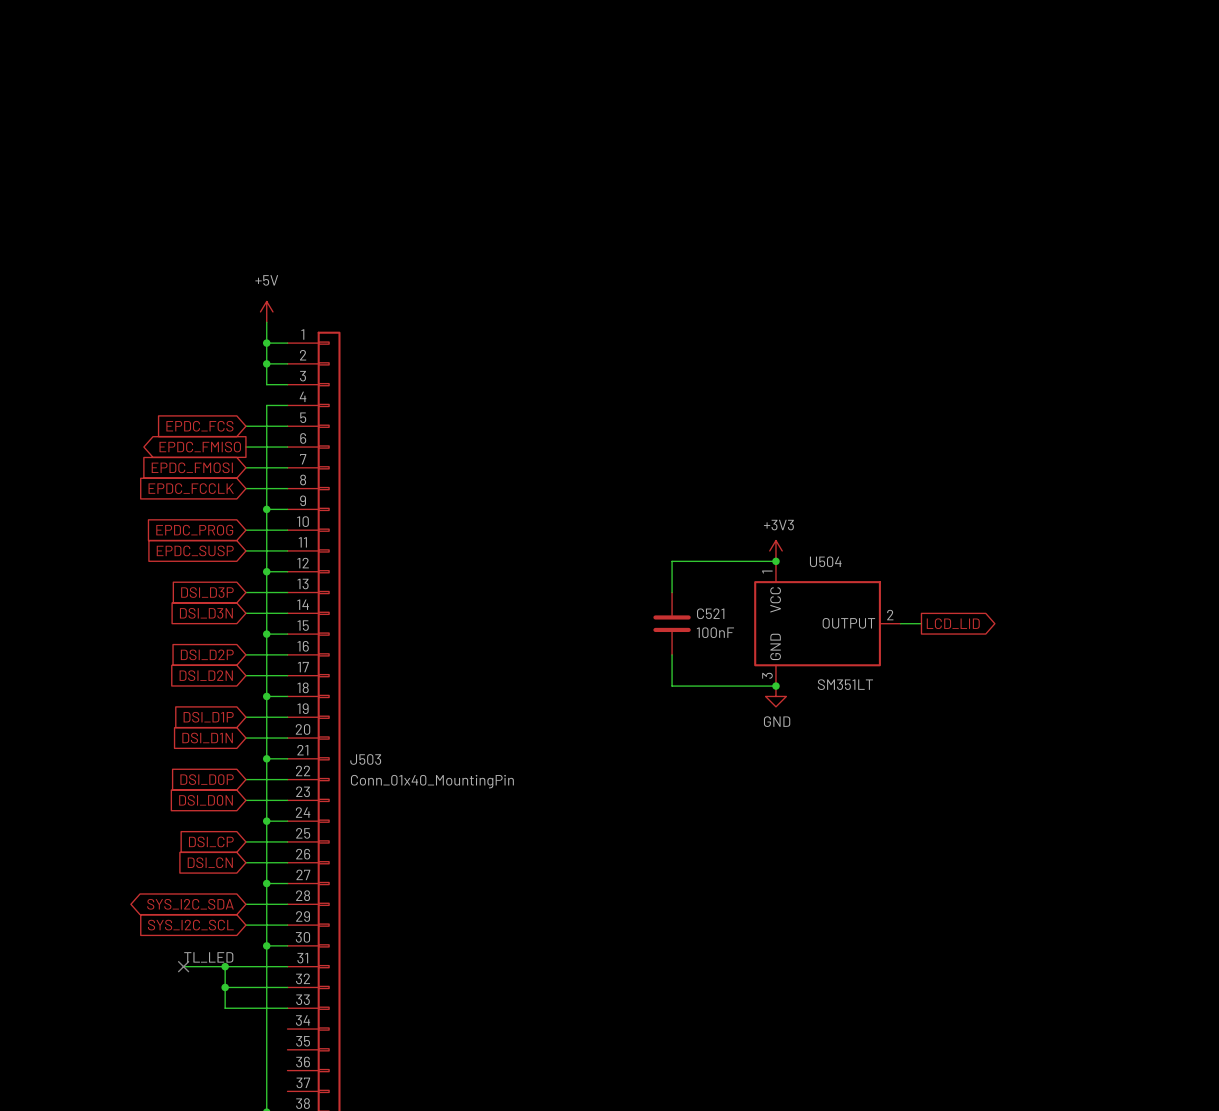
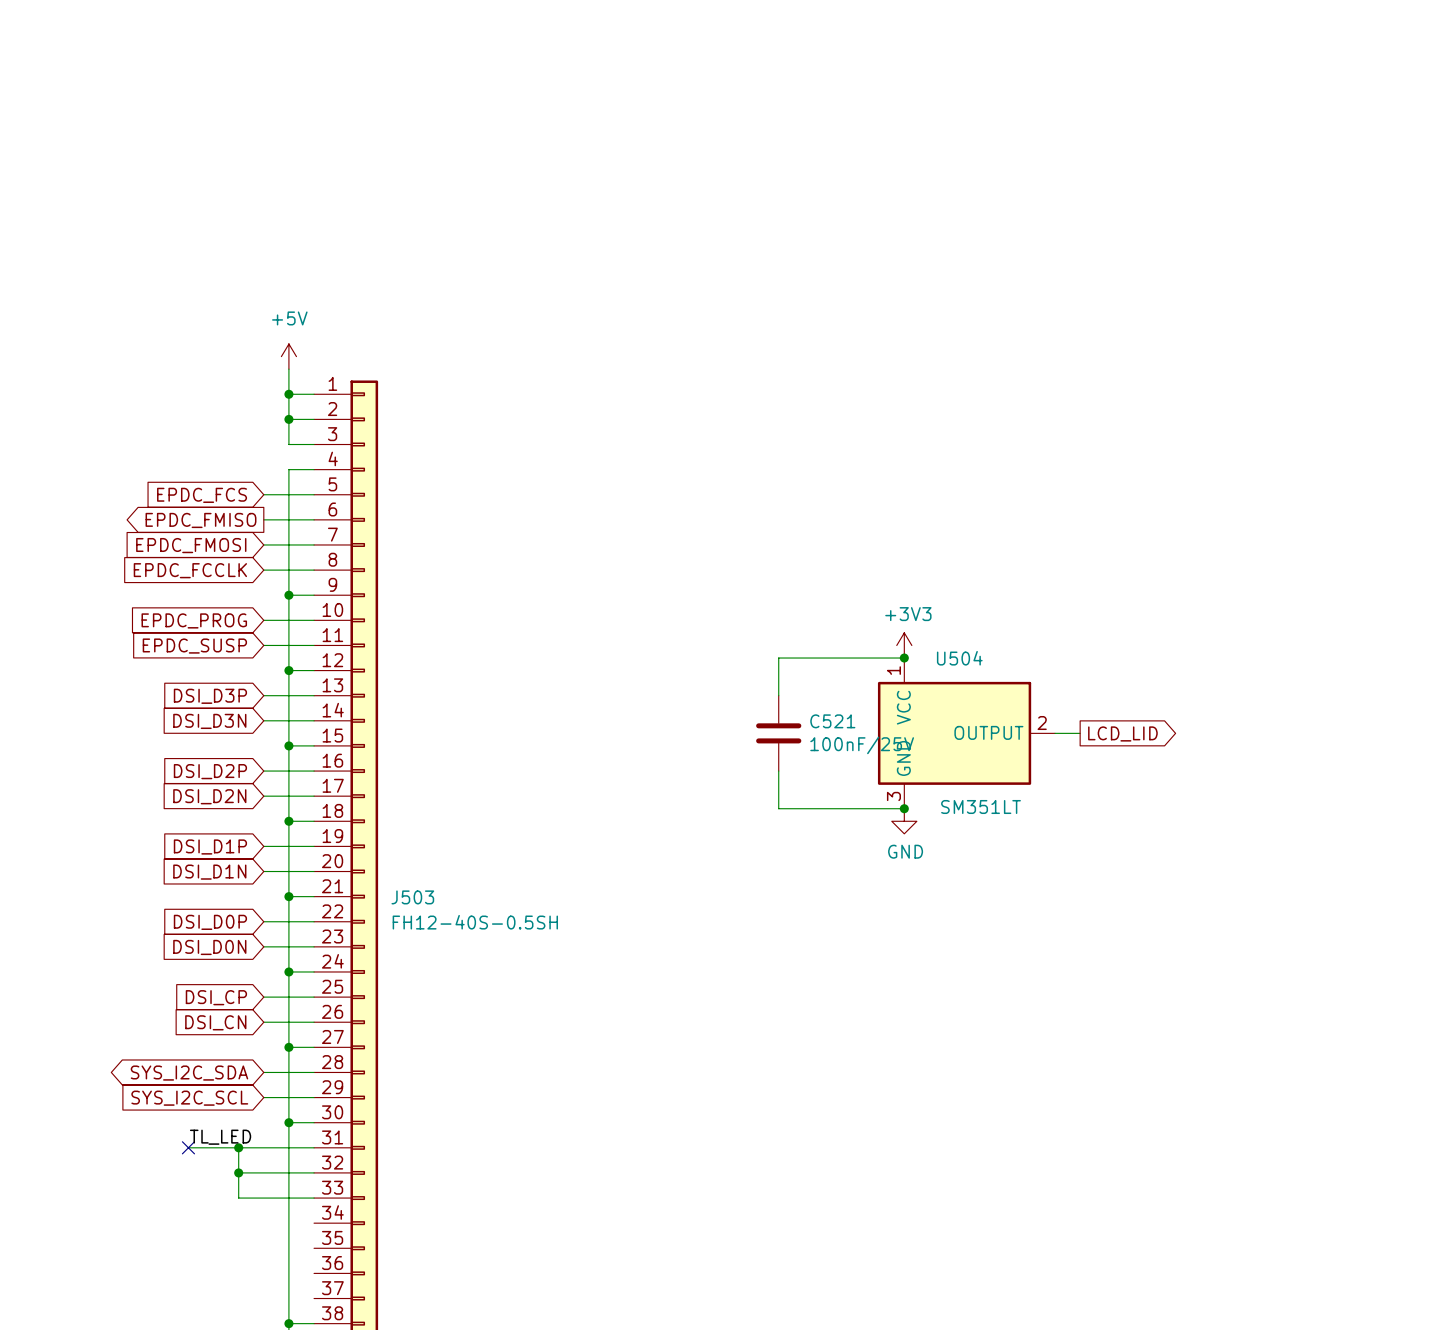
C521 value: 100nF (715, 632) -> 100nF/25V (862, 745)
J503 value: Conn_01x40_MountingPin (432, 781) -> FH12-40S-0.5SH (475, 922)

